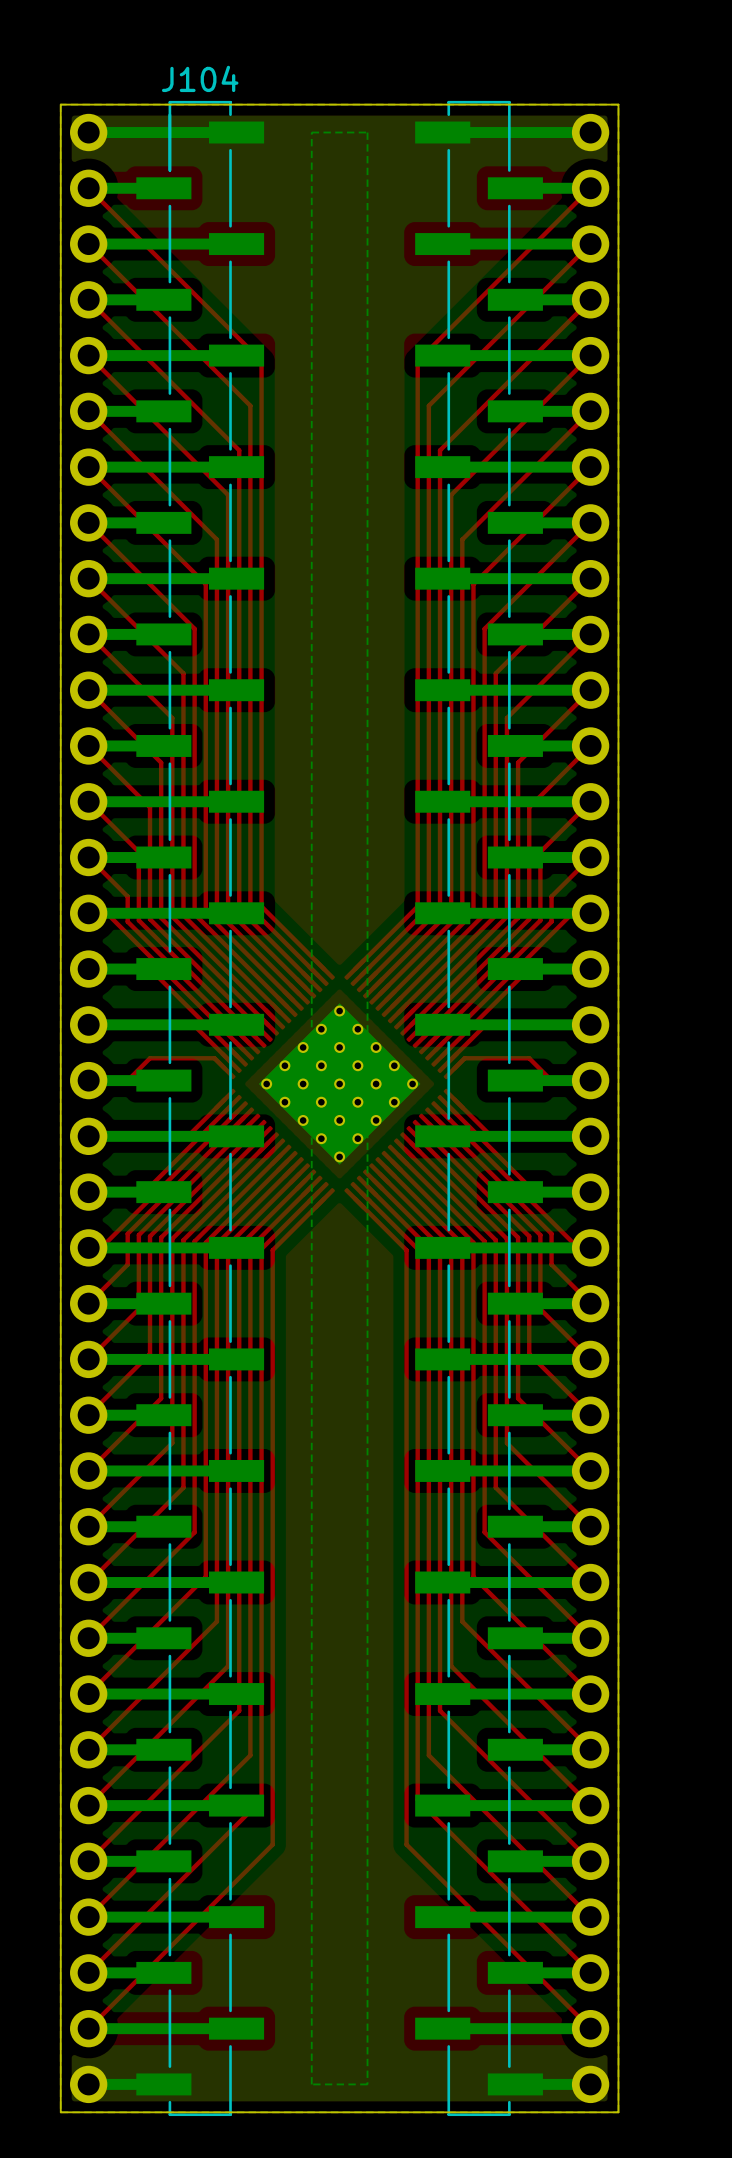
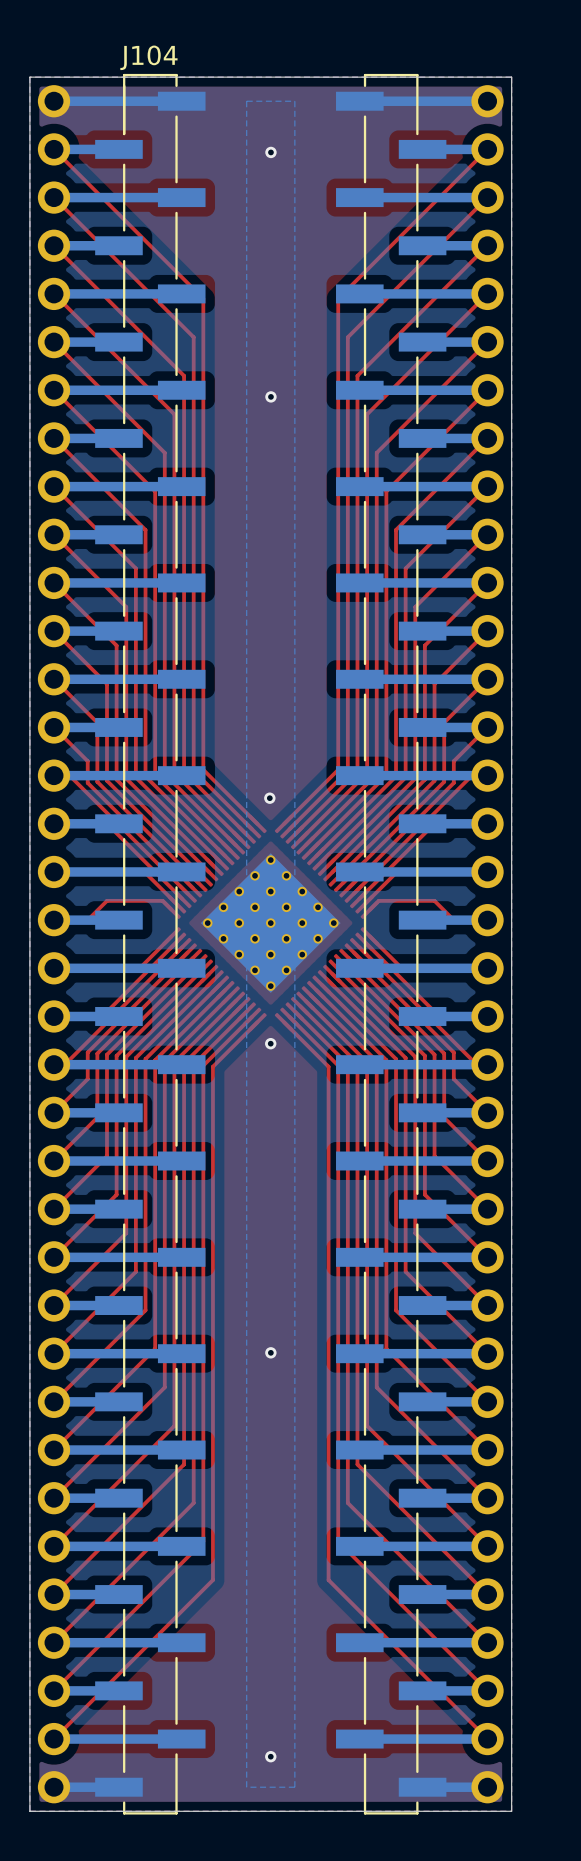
via: none -> (270, 152)
via: none -> (270, 396)
via: none -> (269, 798)
via: none -> (270, 1043)
via: none -> (270, 1352)
via: none -> (270, 1756)

